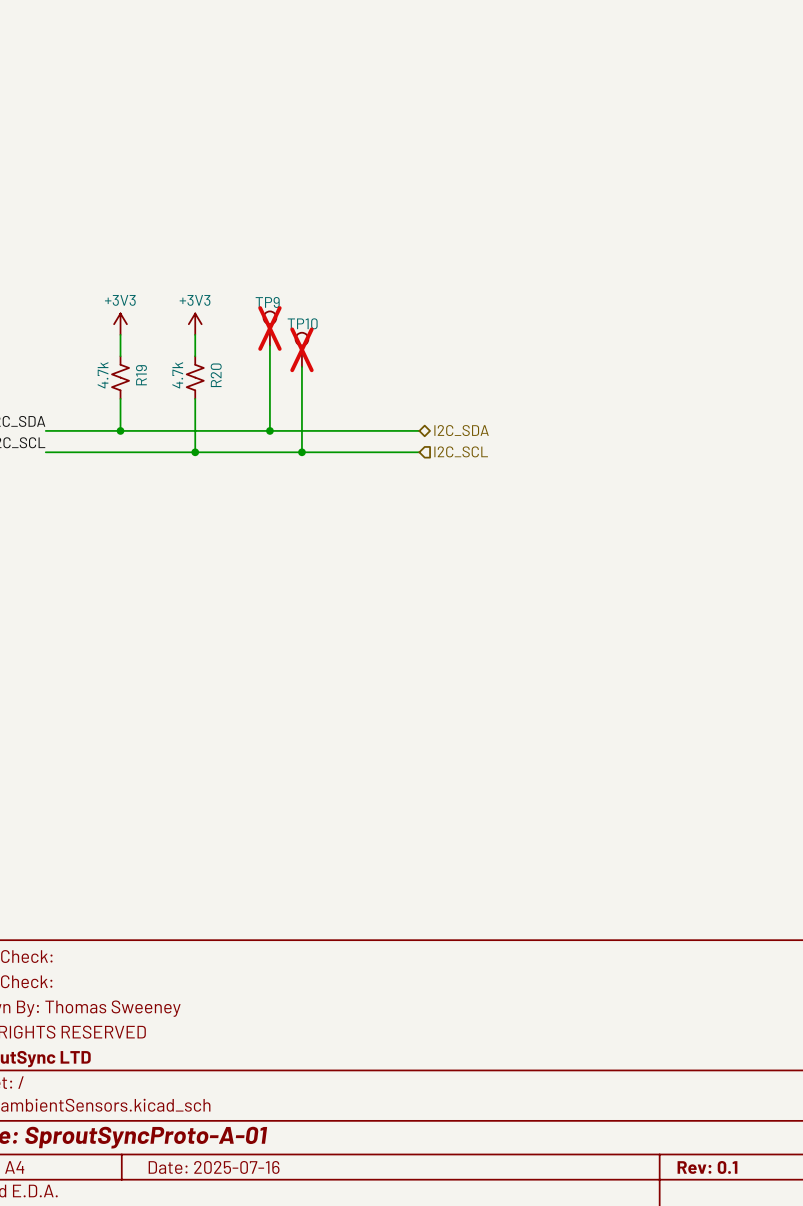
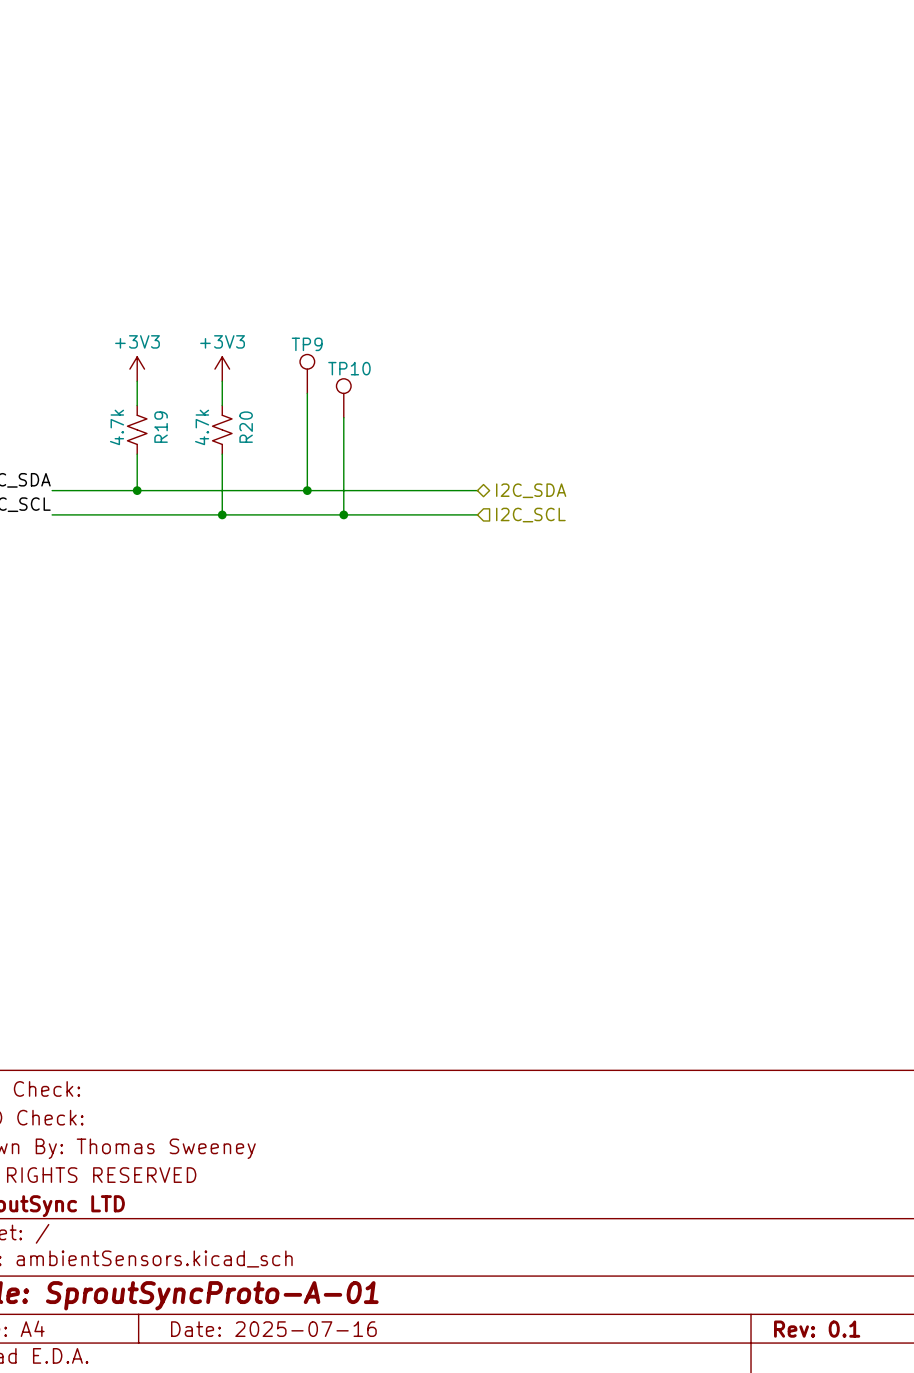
TP9 do-not-place cross: (269, 328) -> none
TP10 do-not-place cross: (301, 349) -> none

